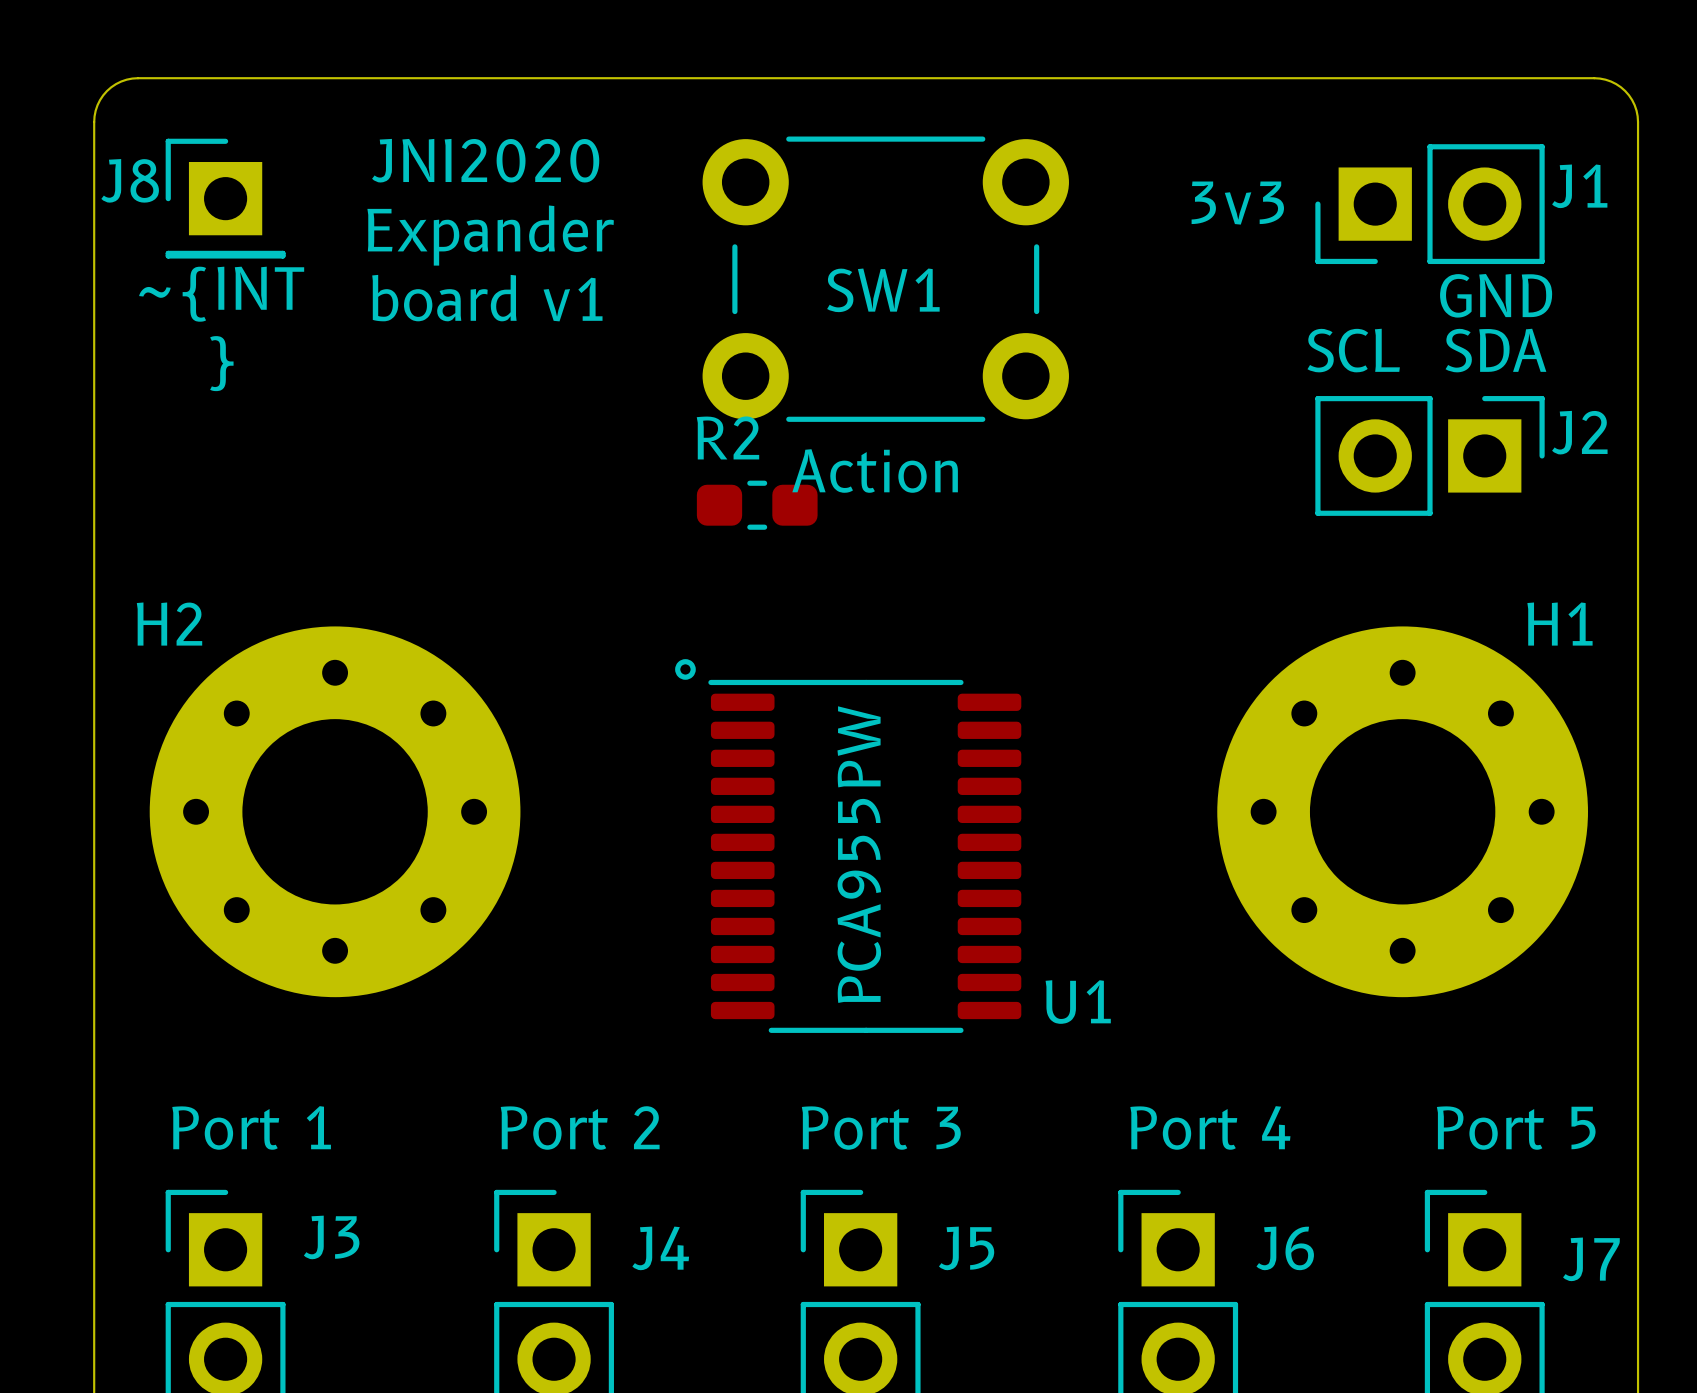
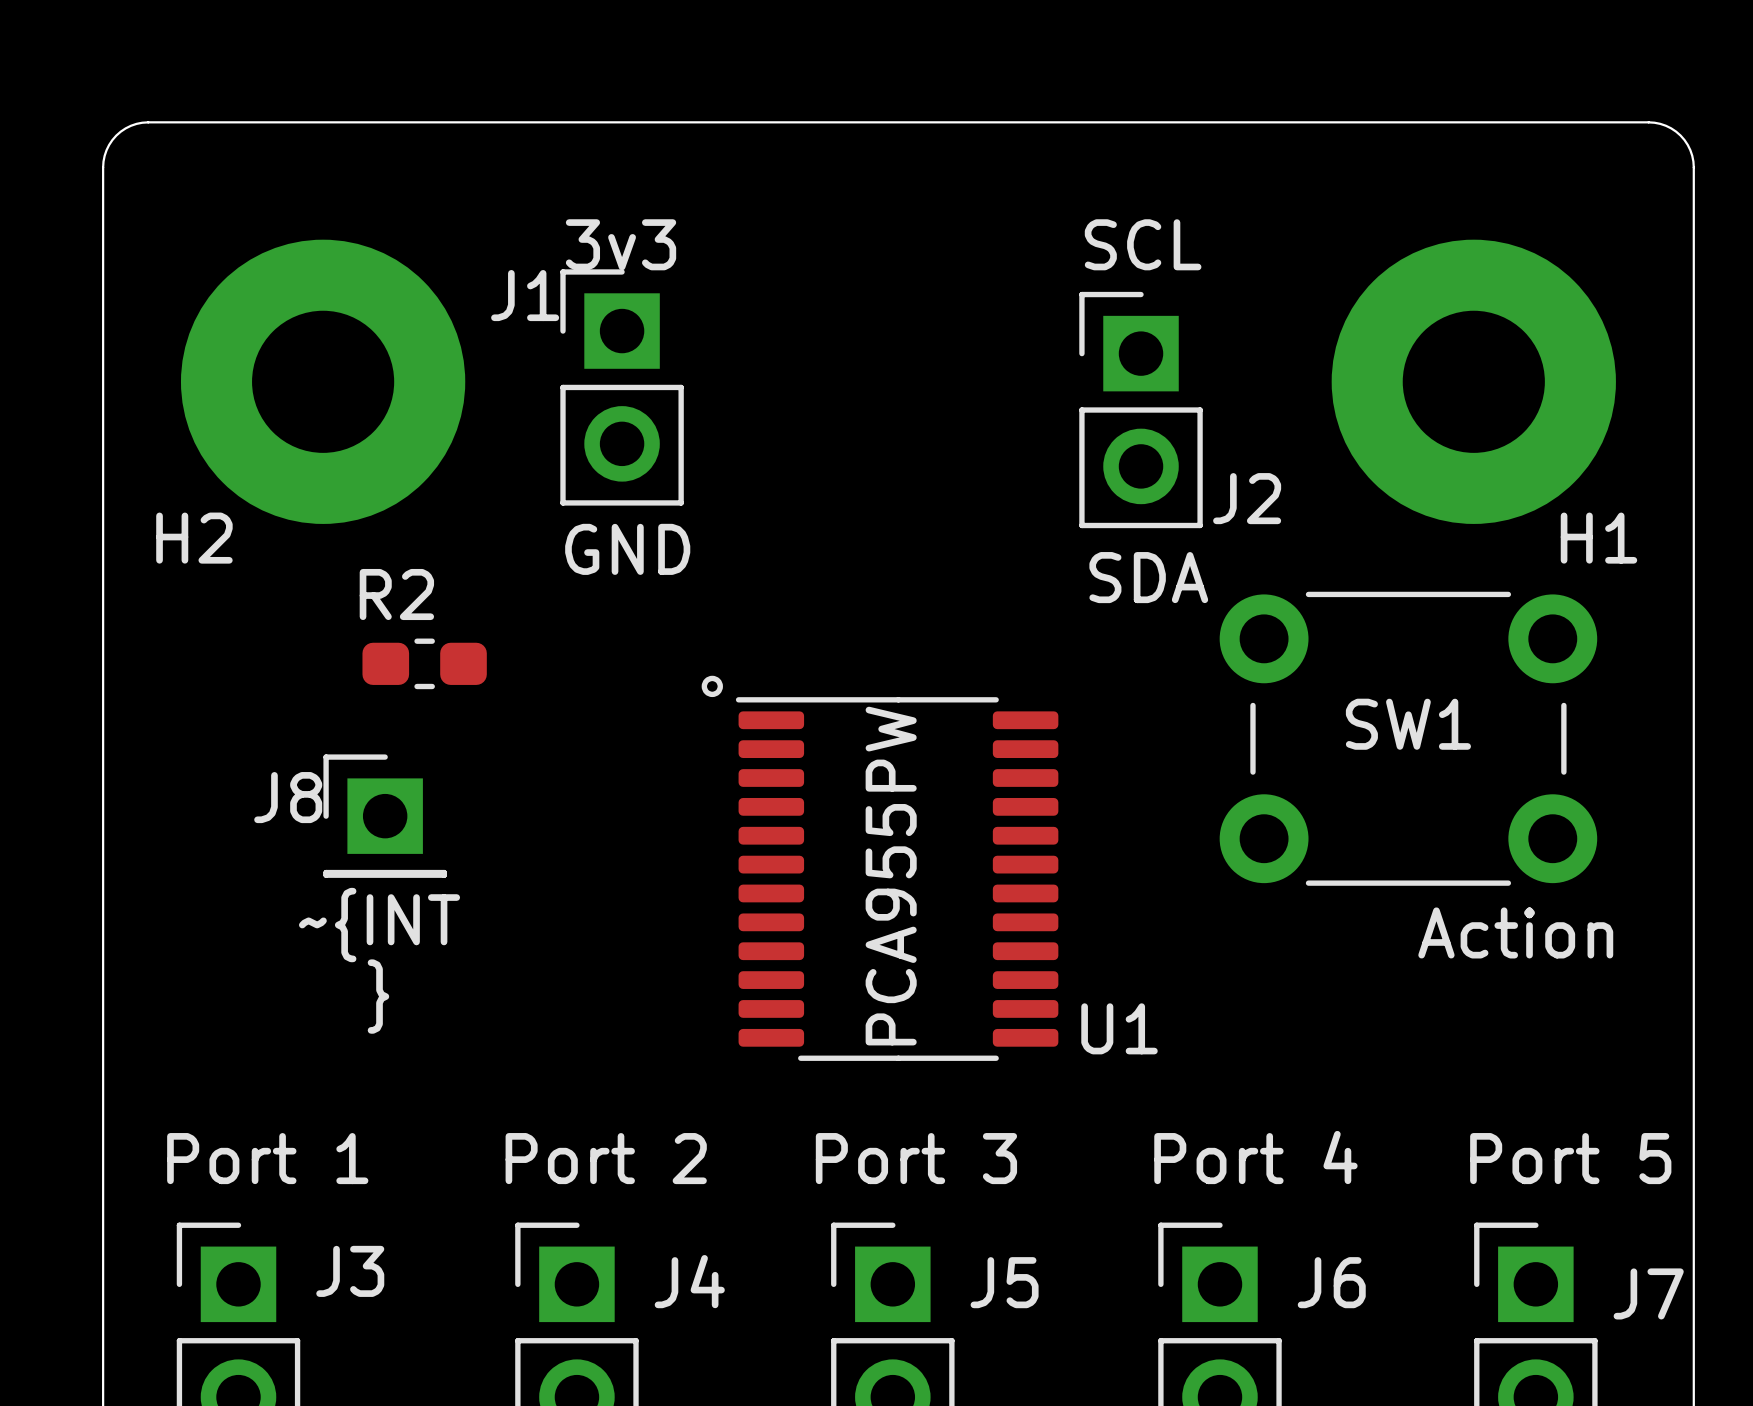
text: JNI2020 (485, 160) -> none
board edge: (94, 165) (94, 116) (100, 100) (116, 84) (137, 78) (1594, 78) (1616, 84) (1632, 100) (1637, 116) (1638, 165) -> (103, 167) (106, 150) (116, 135) (130, 125) (148, 122) (1648, 122) (1665, 125) (1680, 135) (1690, 150) (1693, 167)
J1 name position: J1 (1579, 186) -> J1 (525, 295)
J8 position: (225, 198) -> (385, 816)
text position: 3v3 (1237, 203) -> 3v3 (621, 244)
J1 rotation: 0° (1430, 204) -> 90° clockwise (622, 387)
J1 position: (1430, 204) -> (622, 387)
text: Expander (490, 235) -> none
SW1 position: (885, 279) -> (1408, 738)
SW1 name position: SW1 (883, 290) -> SW1 (1408, 724)
text position: ~{INT (221, 294) -> ~{INT (379, 925)
text position: GND (1496, 295) -> GND (627, 549)
text: board v1 (487, 298) -> none
text position: SCL (1353, 350) -> SCL (1143, 244)
text position: SDA (1495, 350) -> SDA (1148, 577)
text position: } (221, 363) -> } (378, 996)
J2 name position: J2 (1579, 432) -> J2 (1247, 498)
J2 rotation: 0° (1430, 455) -> 90° counterclockwise (1141, 410)
J2 position: (1430, 455) -> (1141, 410)
text position: Action (875, 470) -> Action (1515, 932)
R2 position: (757, 505) -> (424, 663)
H2 name position: H2 (169, 624) -> H2 (194, 538)
H1 name position: H1 (1559, 624) -> H1 (1598, 538)
H2 footprint: [149, 626, 521, 998] -> [180, 239, 466, 524]
H1 footprint: [1217, 626, 1588, 998] -> [1331, 239, 1616, 524]

